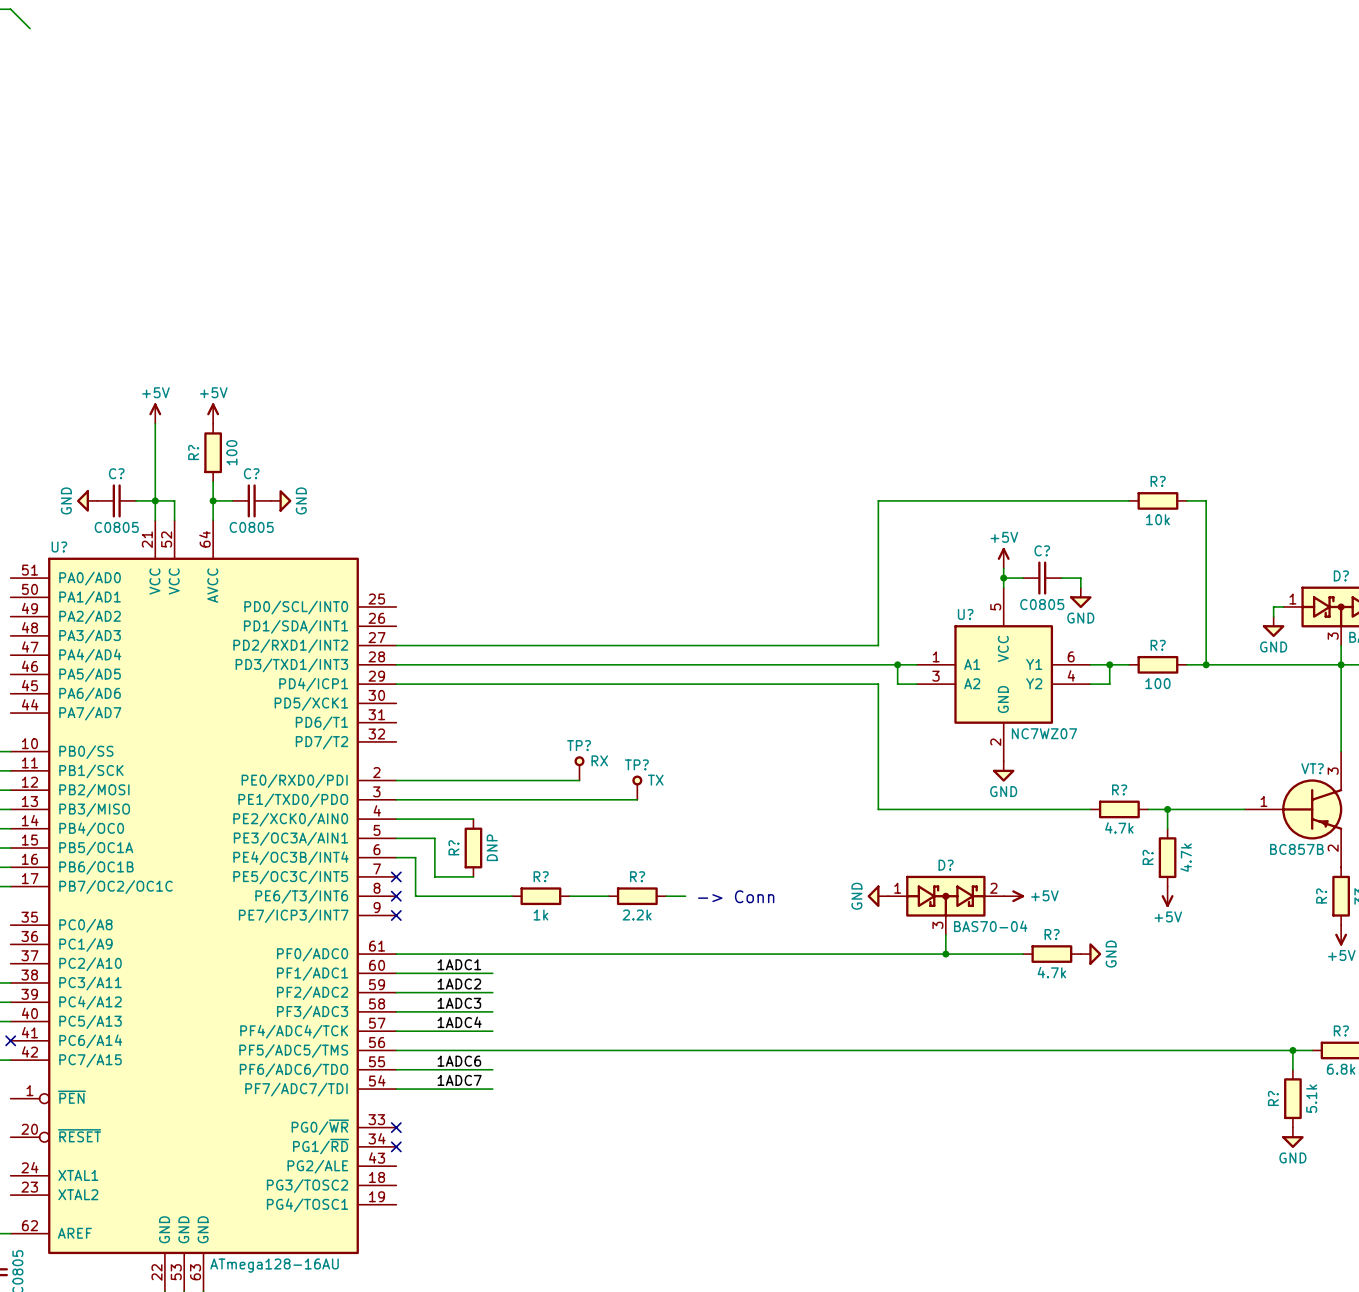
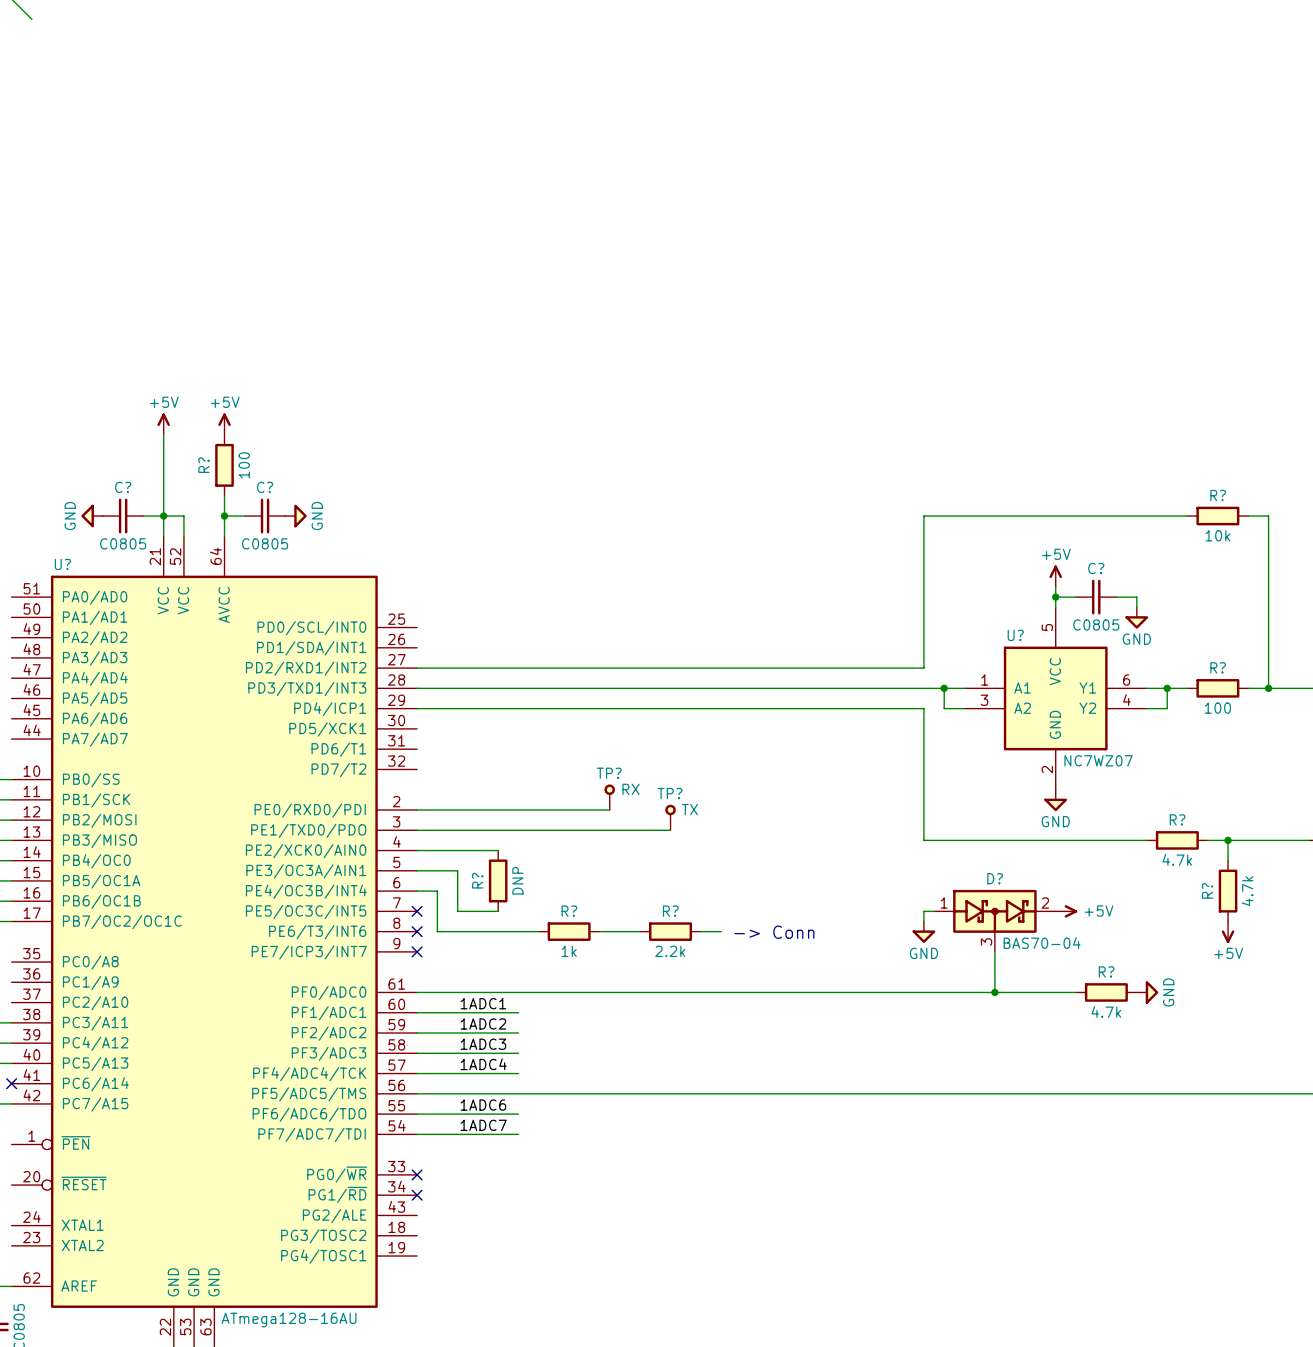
wire: none -> (934, 911) (923, 911) (923, 921)
power symbol rotation: 0° (877, 896) -> 90° counterclockwise (923, 932)
power symbol position: +5V (1013, 896) -> +5V (1066, 911)
D? position: (945, 905) -> (994, 920)

